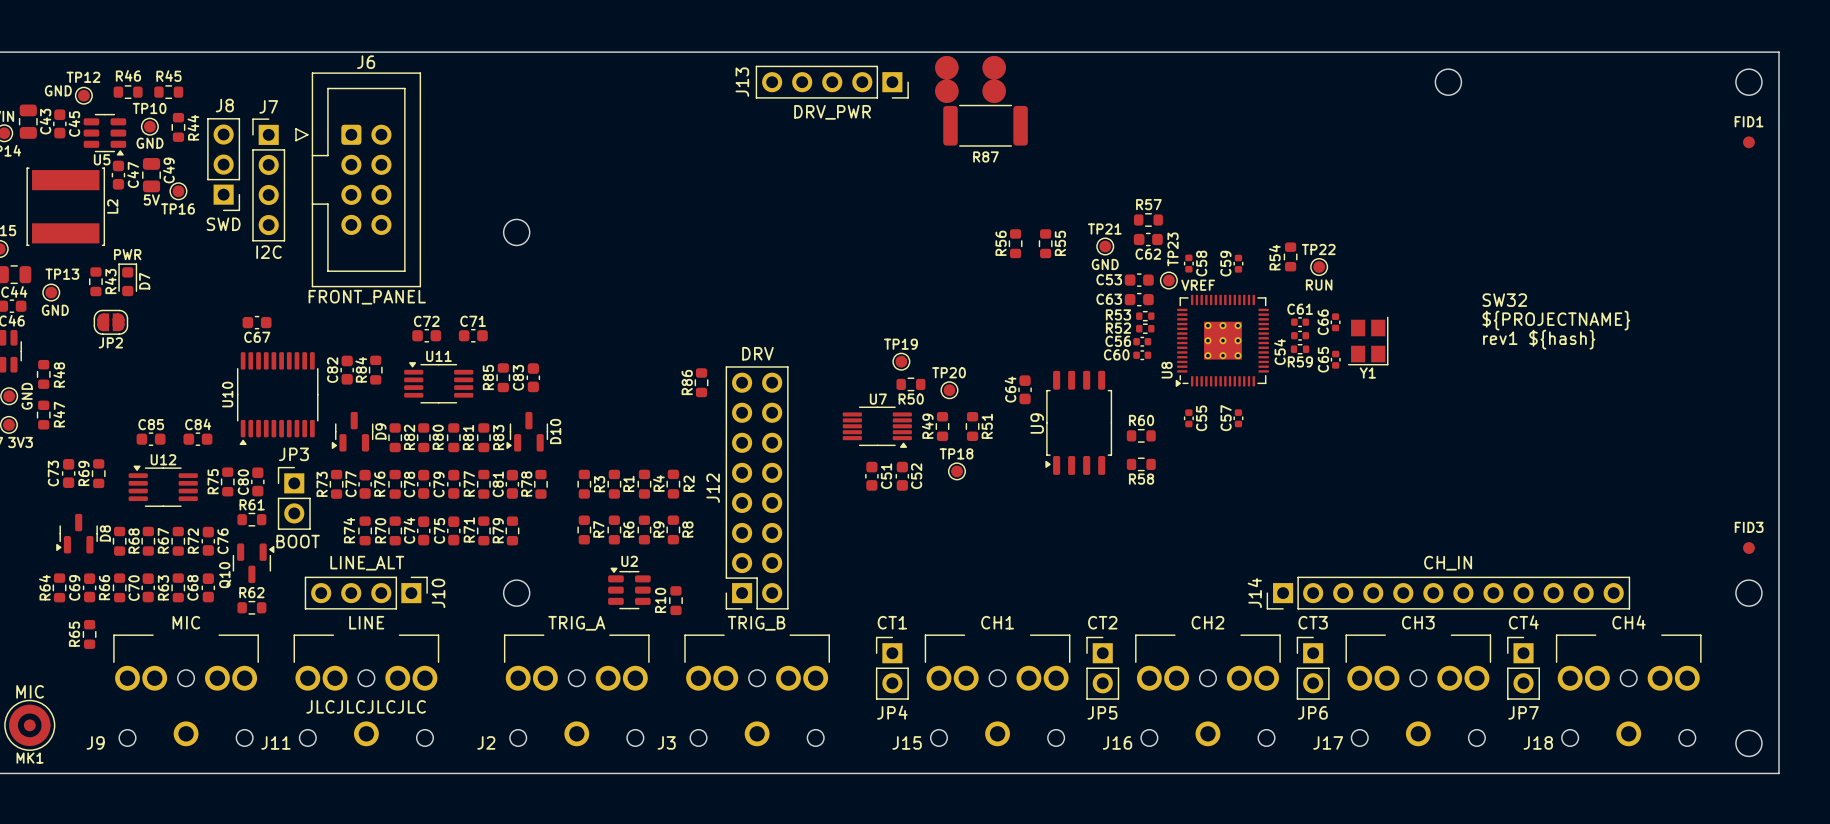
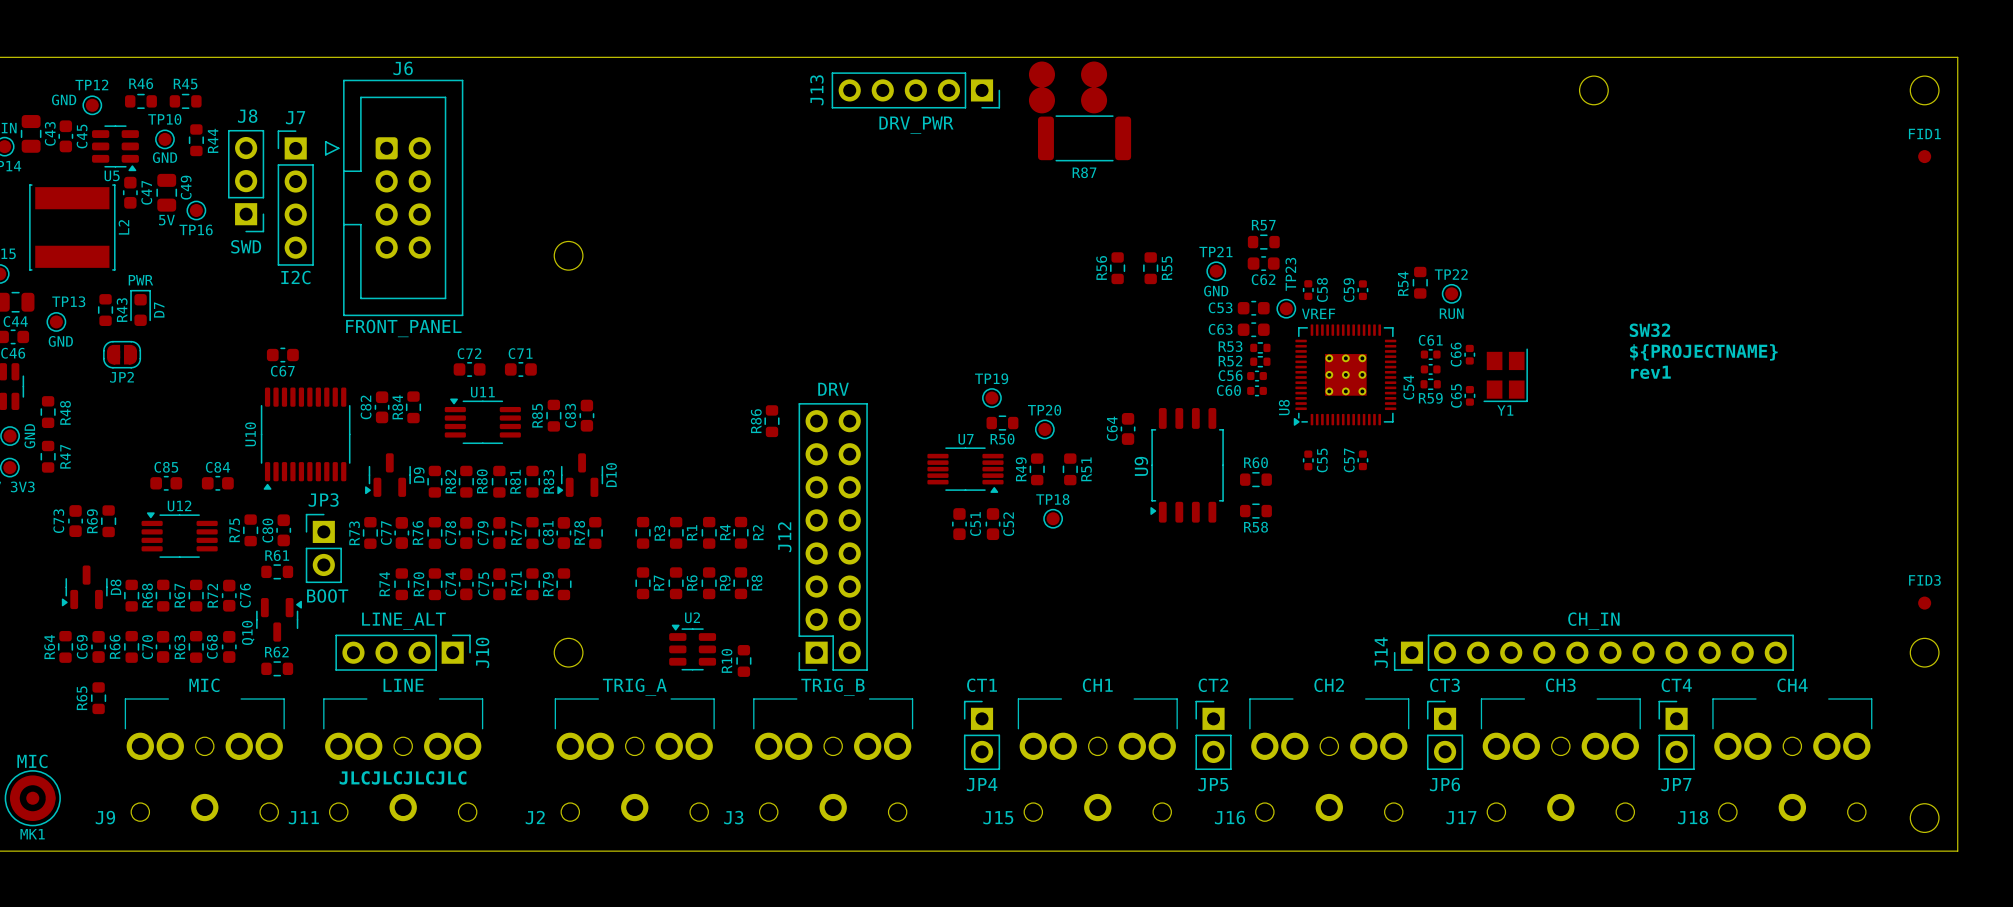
text: rev1 ${hash} (1539, 339) -> rev1 (1650, 372)

